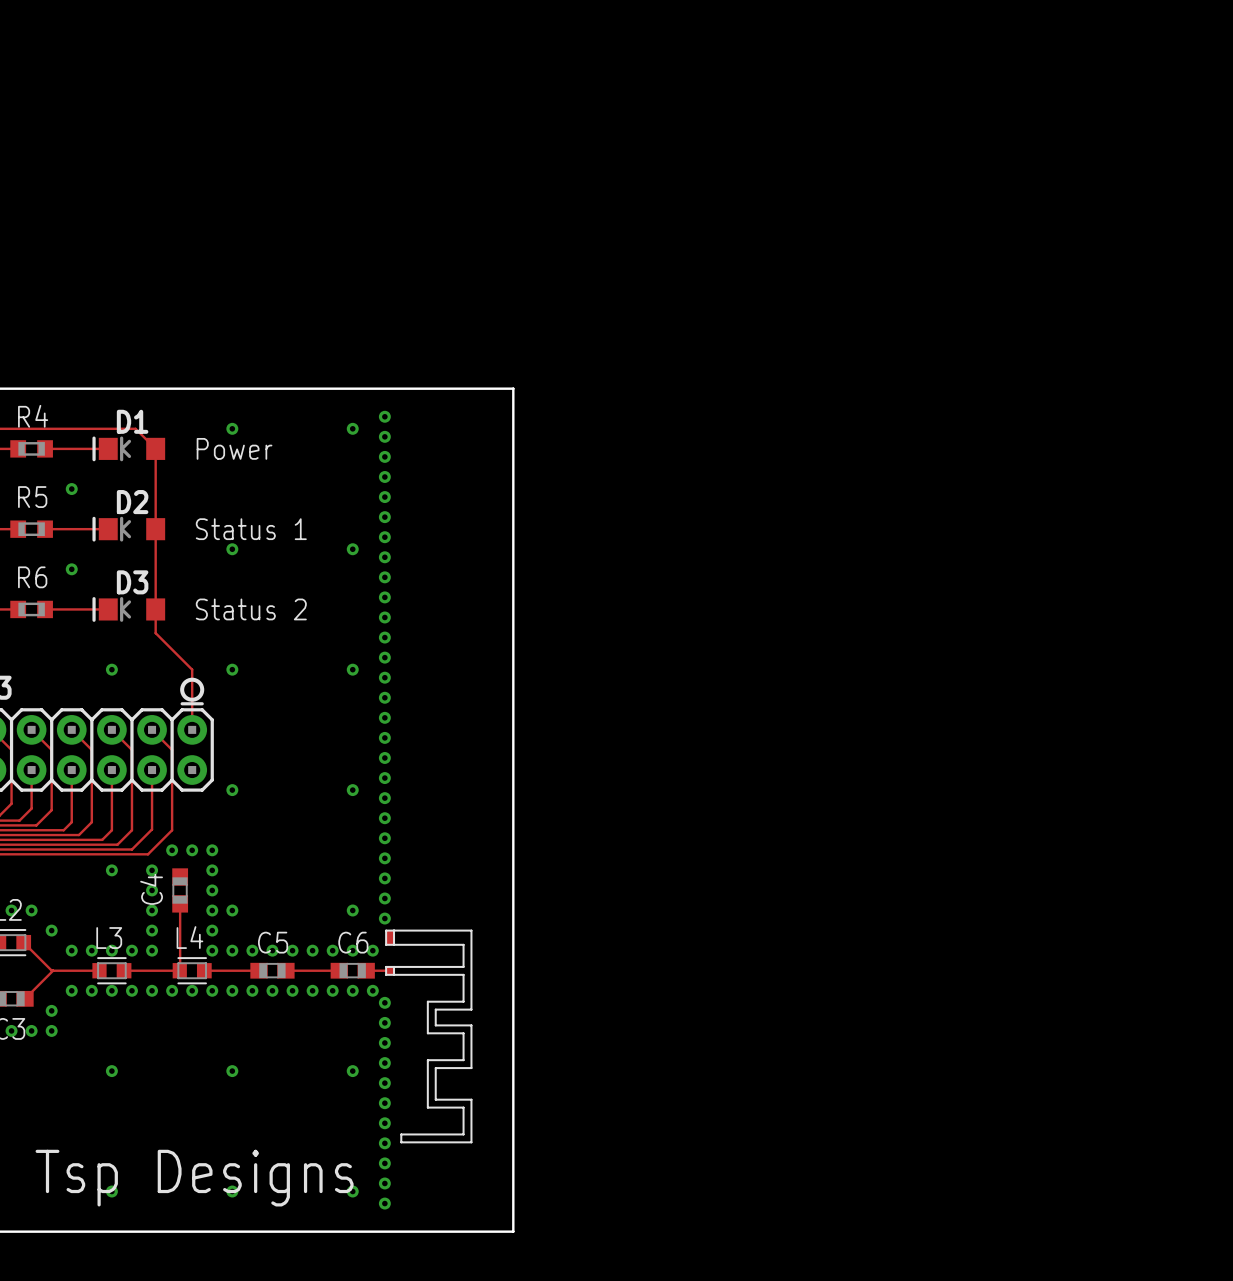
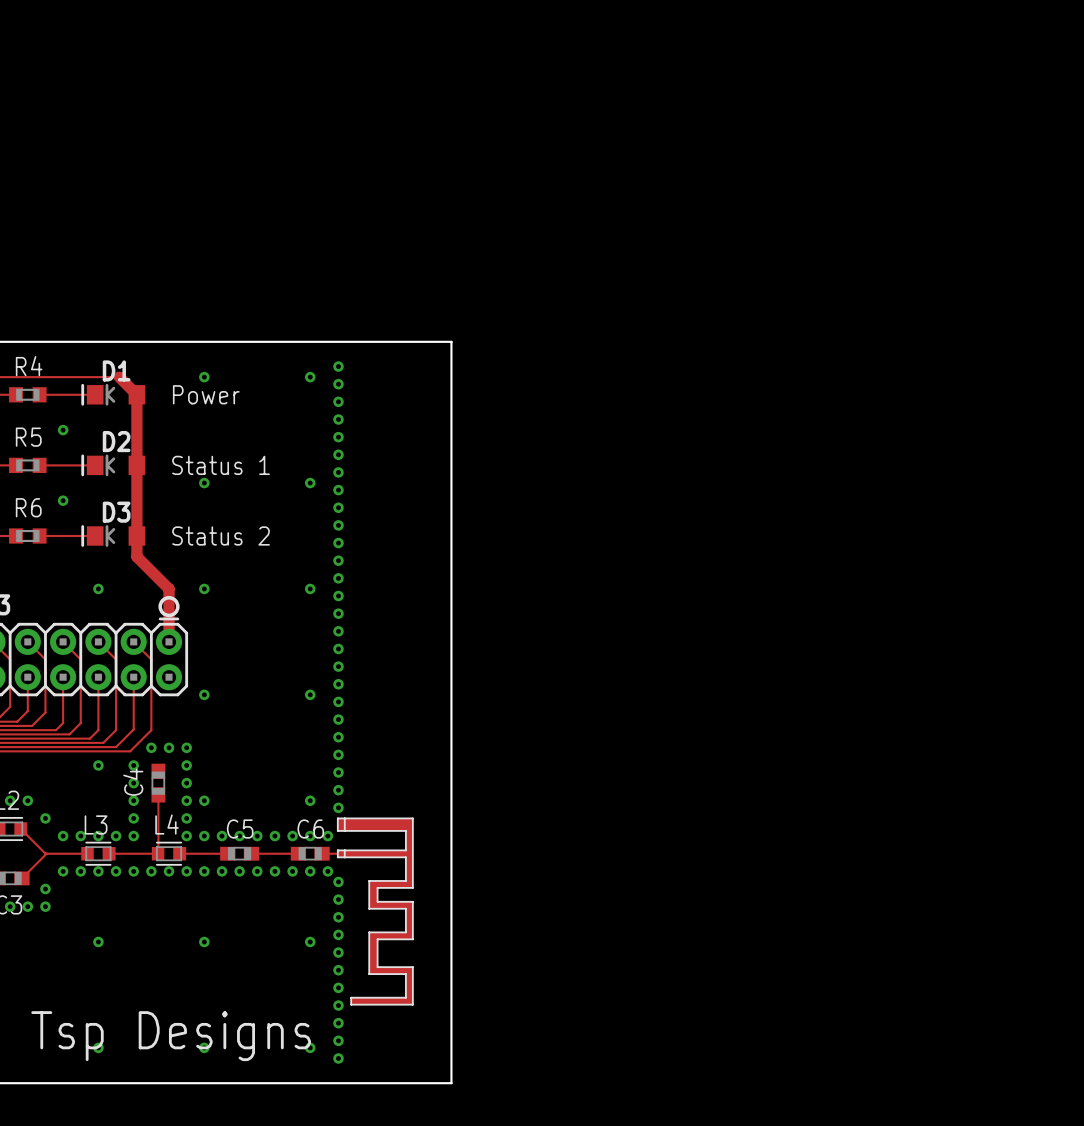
track width: thin (135, 428) (155, 448) (155, 633) (192, 669) (192, 729) -> thick (119, 377) (136, 394) (136, 556) (169, 588) (169, 641)
part footprint: [385, 929, 473, 1144] -> [336, 817, 414, 1006]

